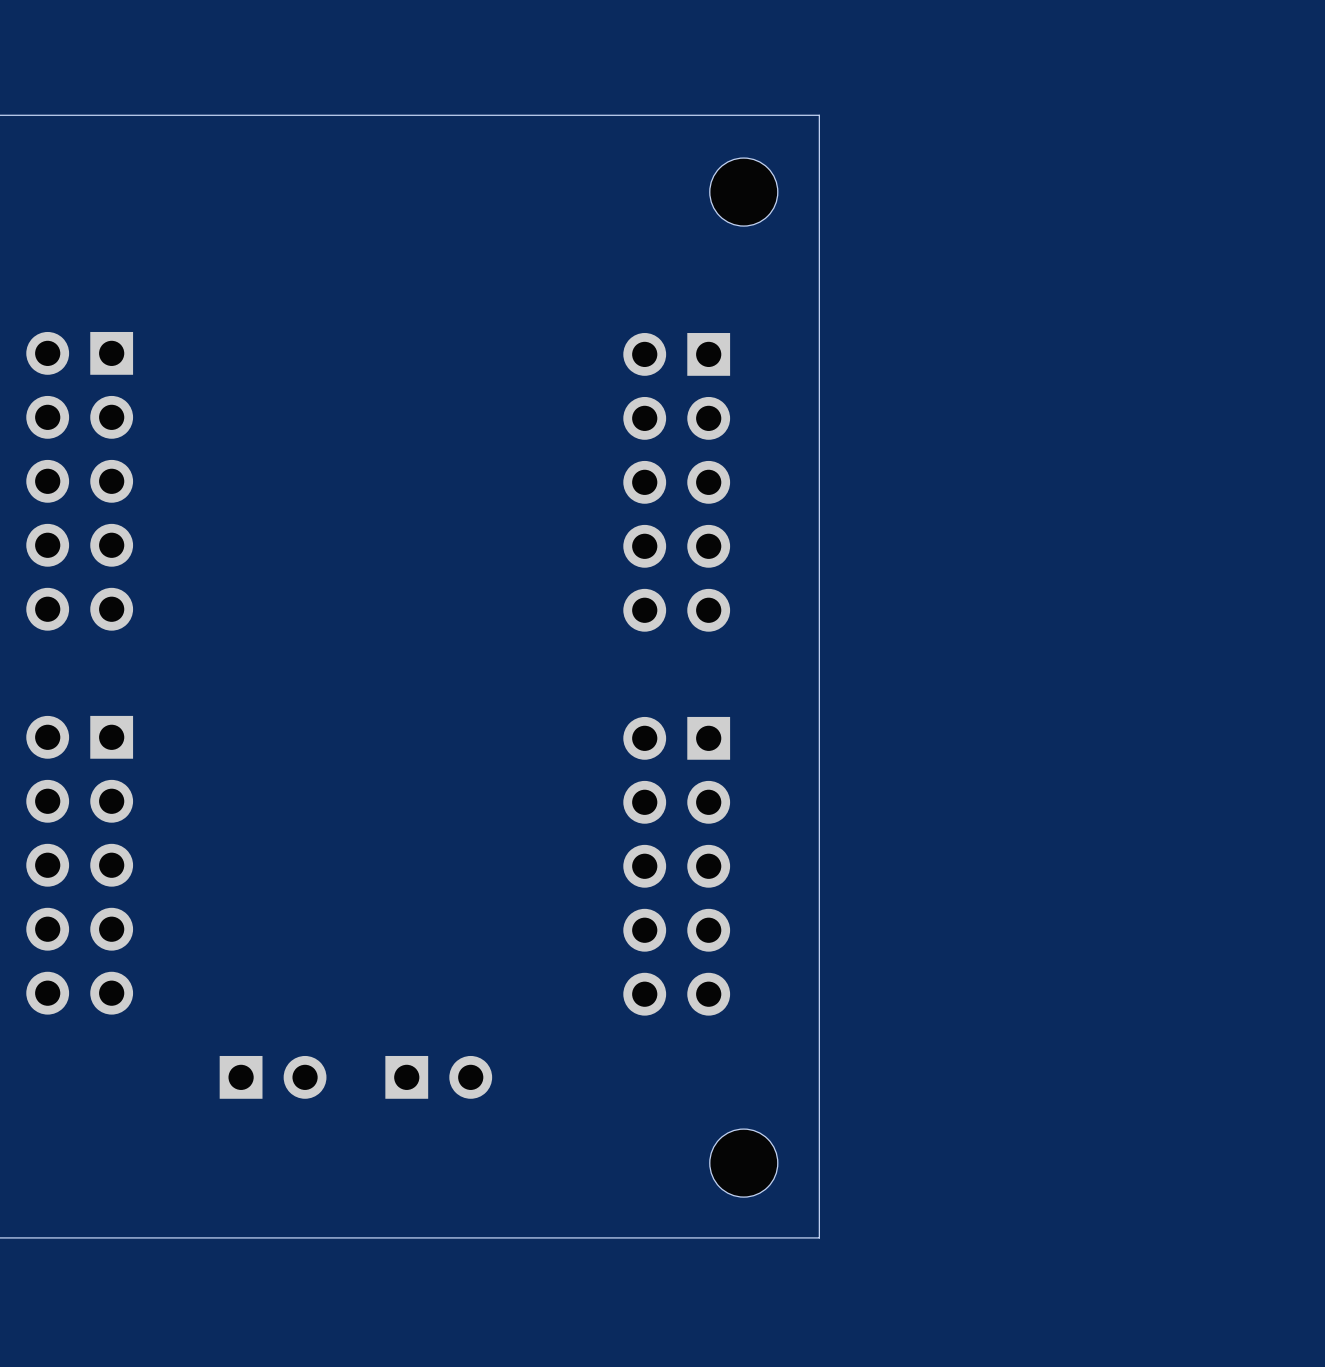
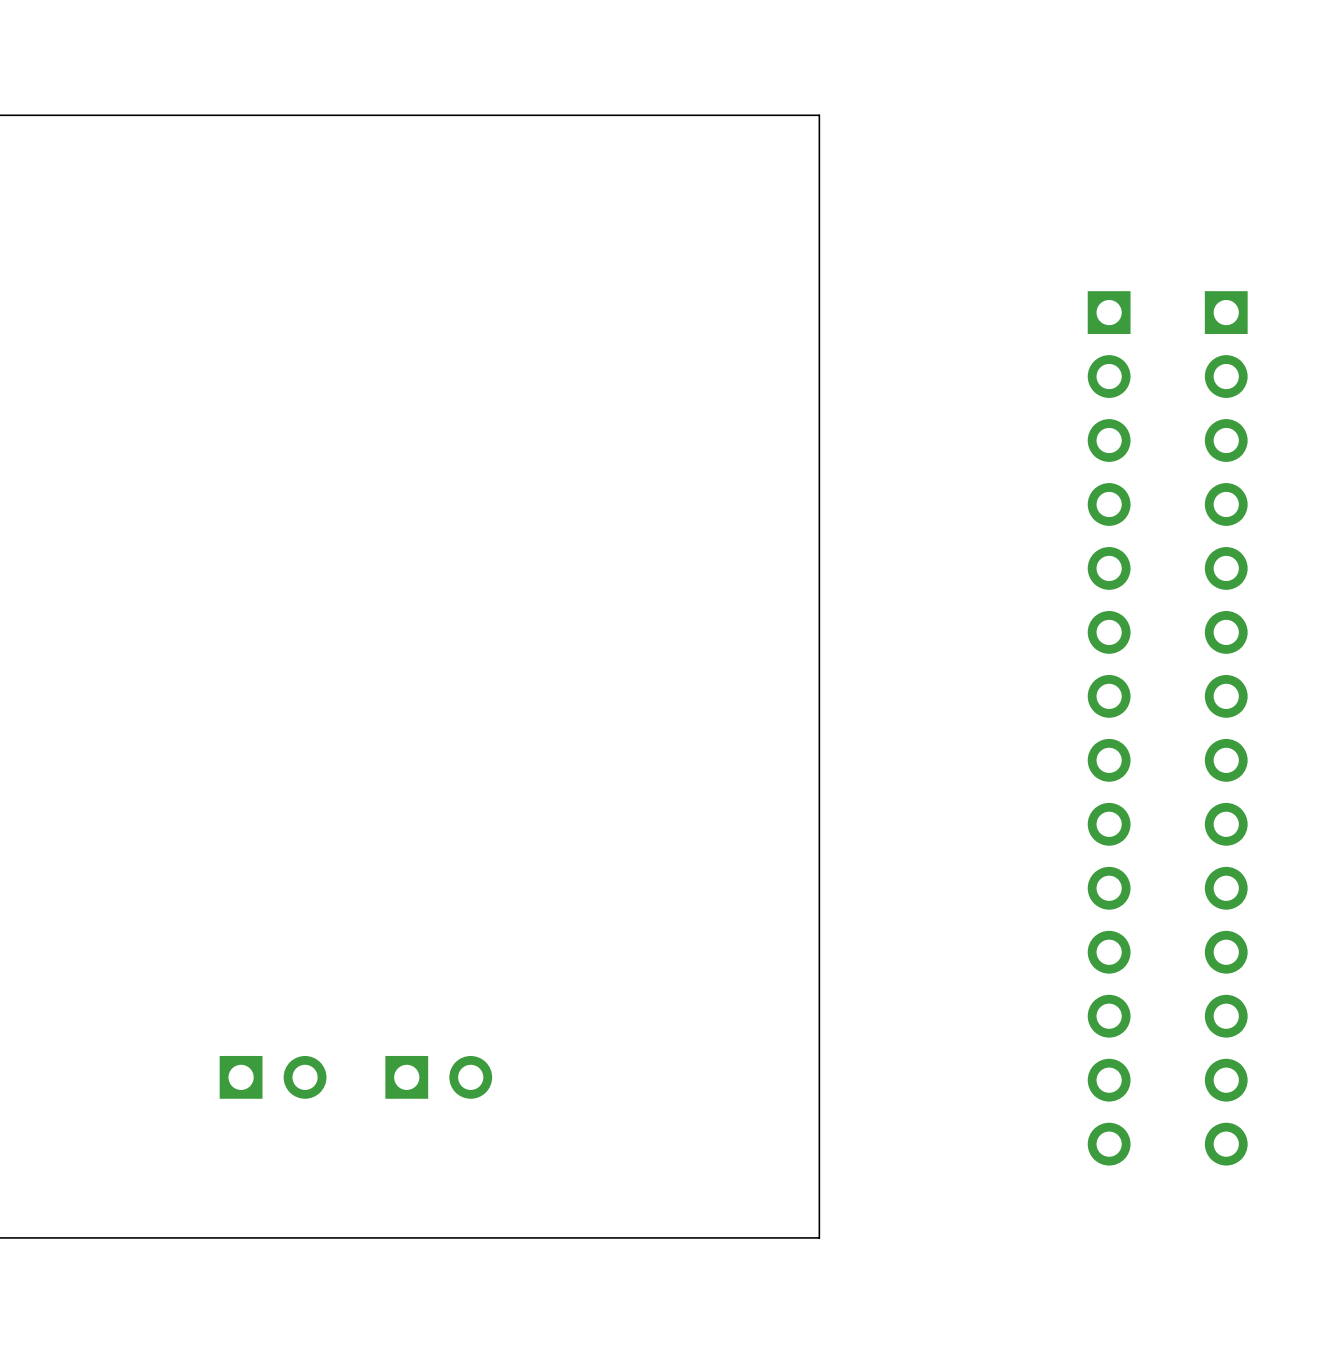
part: (743, 192) -> none
part: (79, 481) -> none
part: (676, 482) -> none
part: none -> (1109, 728)
part: none -> (1226, 728)
part: (79, 865) -> none
part: (676, 866) -> none
part: (743, 1163) -> none

